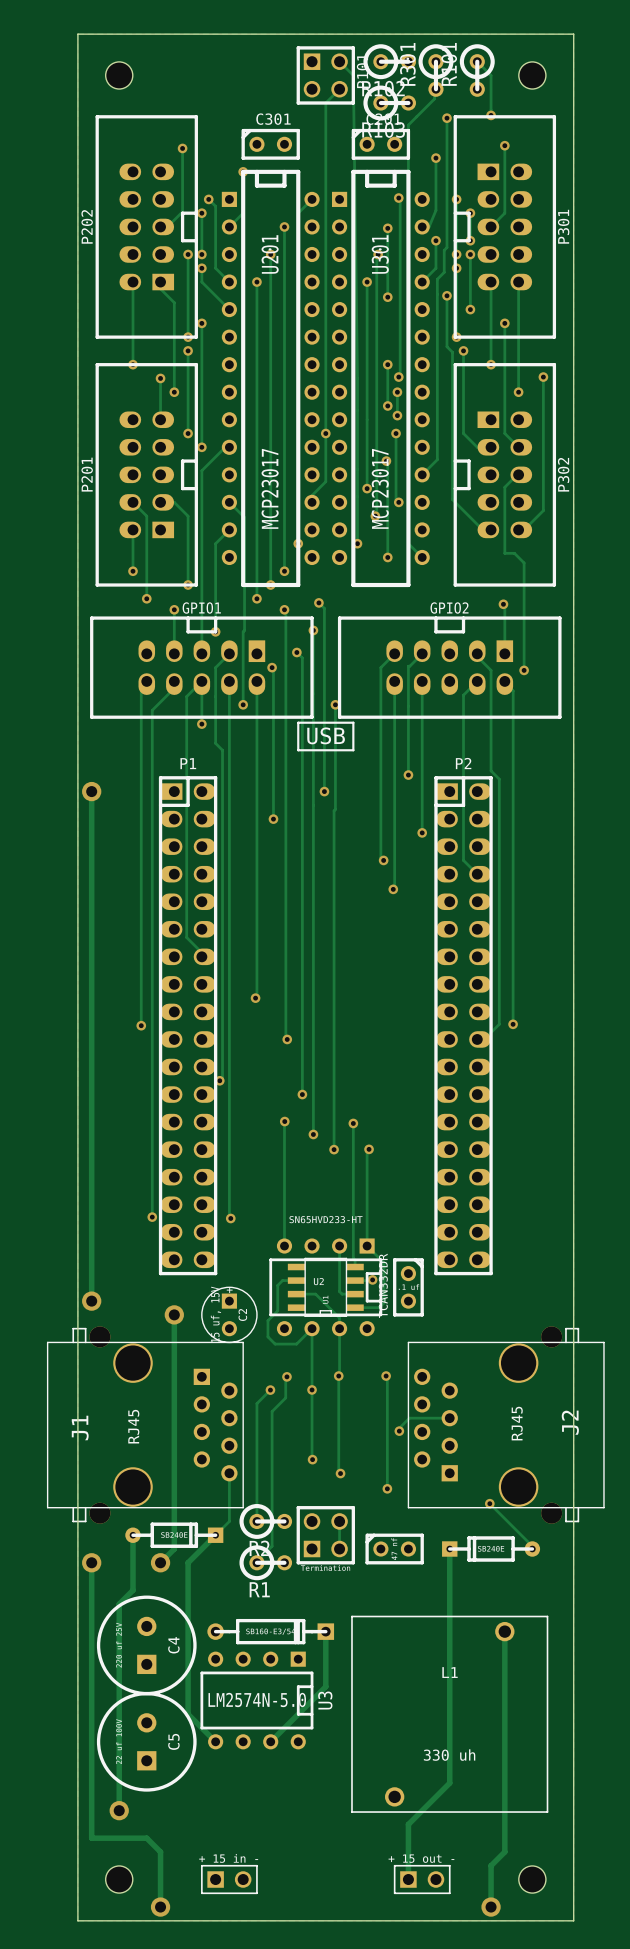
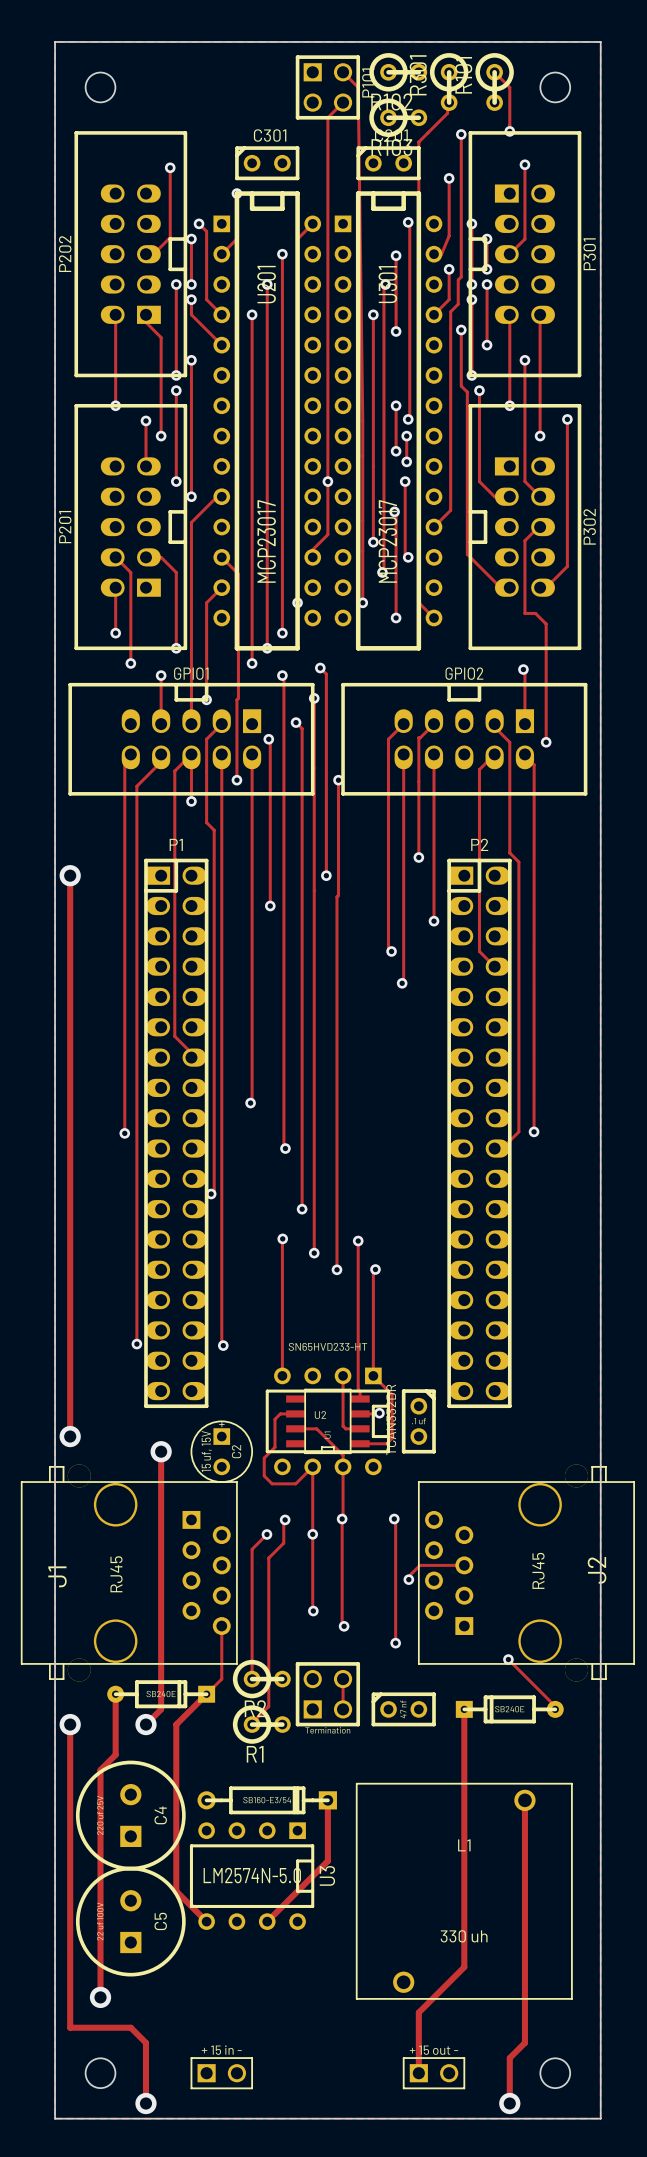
line: (298, 722) (353, 722) (353, 750) (298, 750) (298, 722) -> none
text: USB (326, 735) -> none

